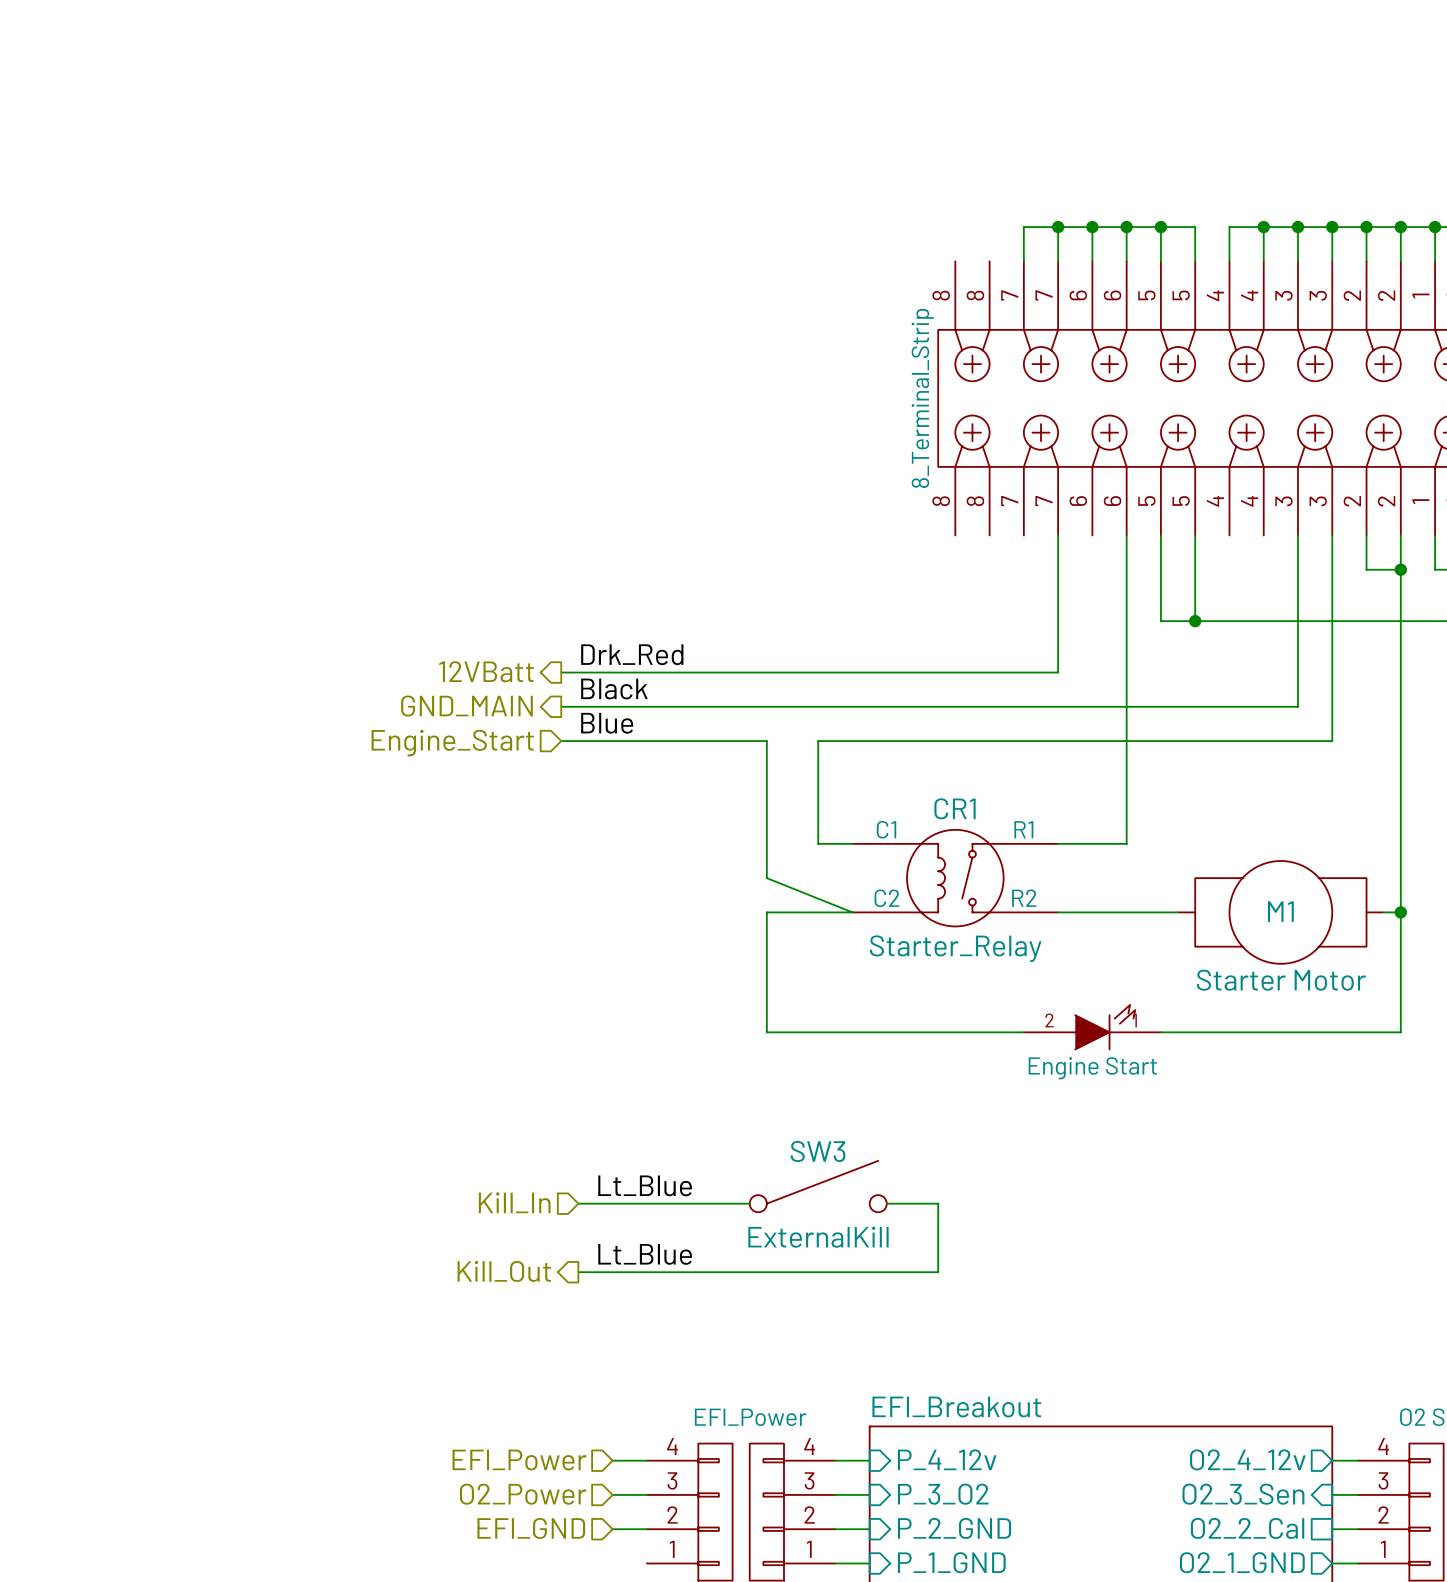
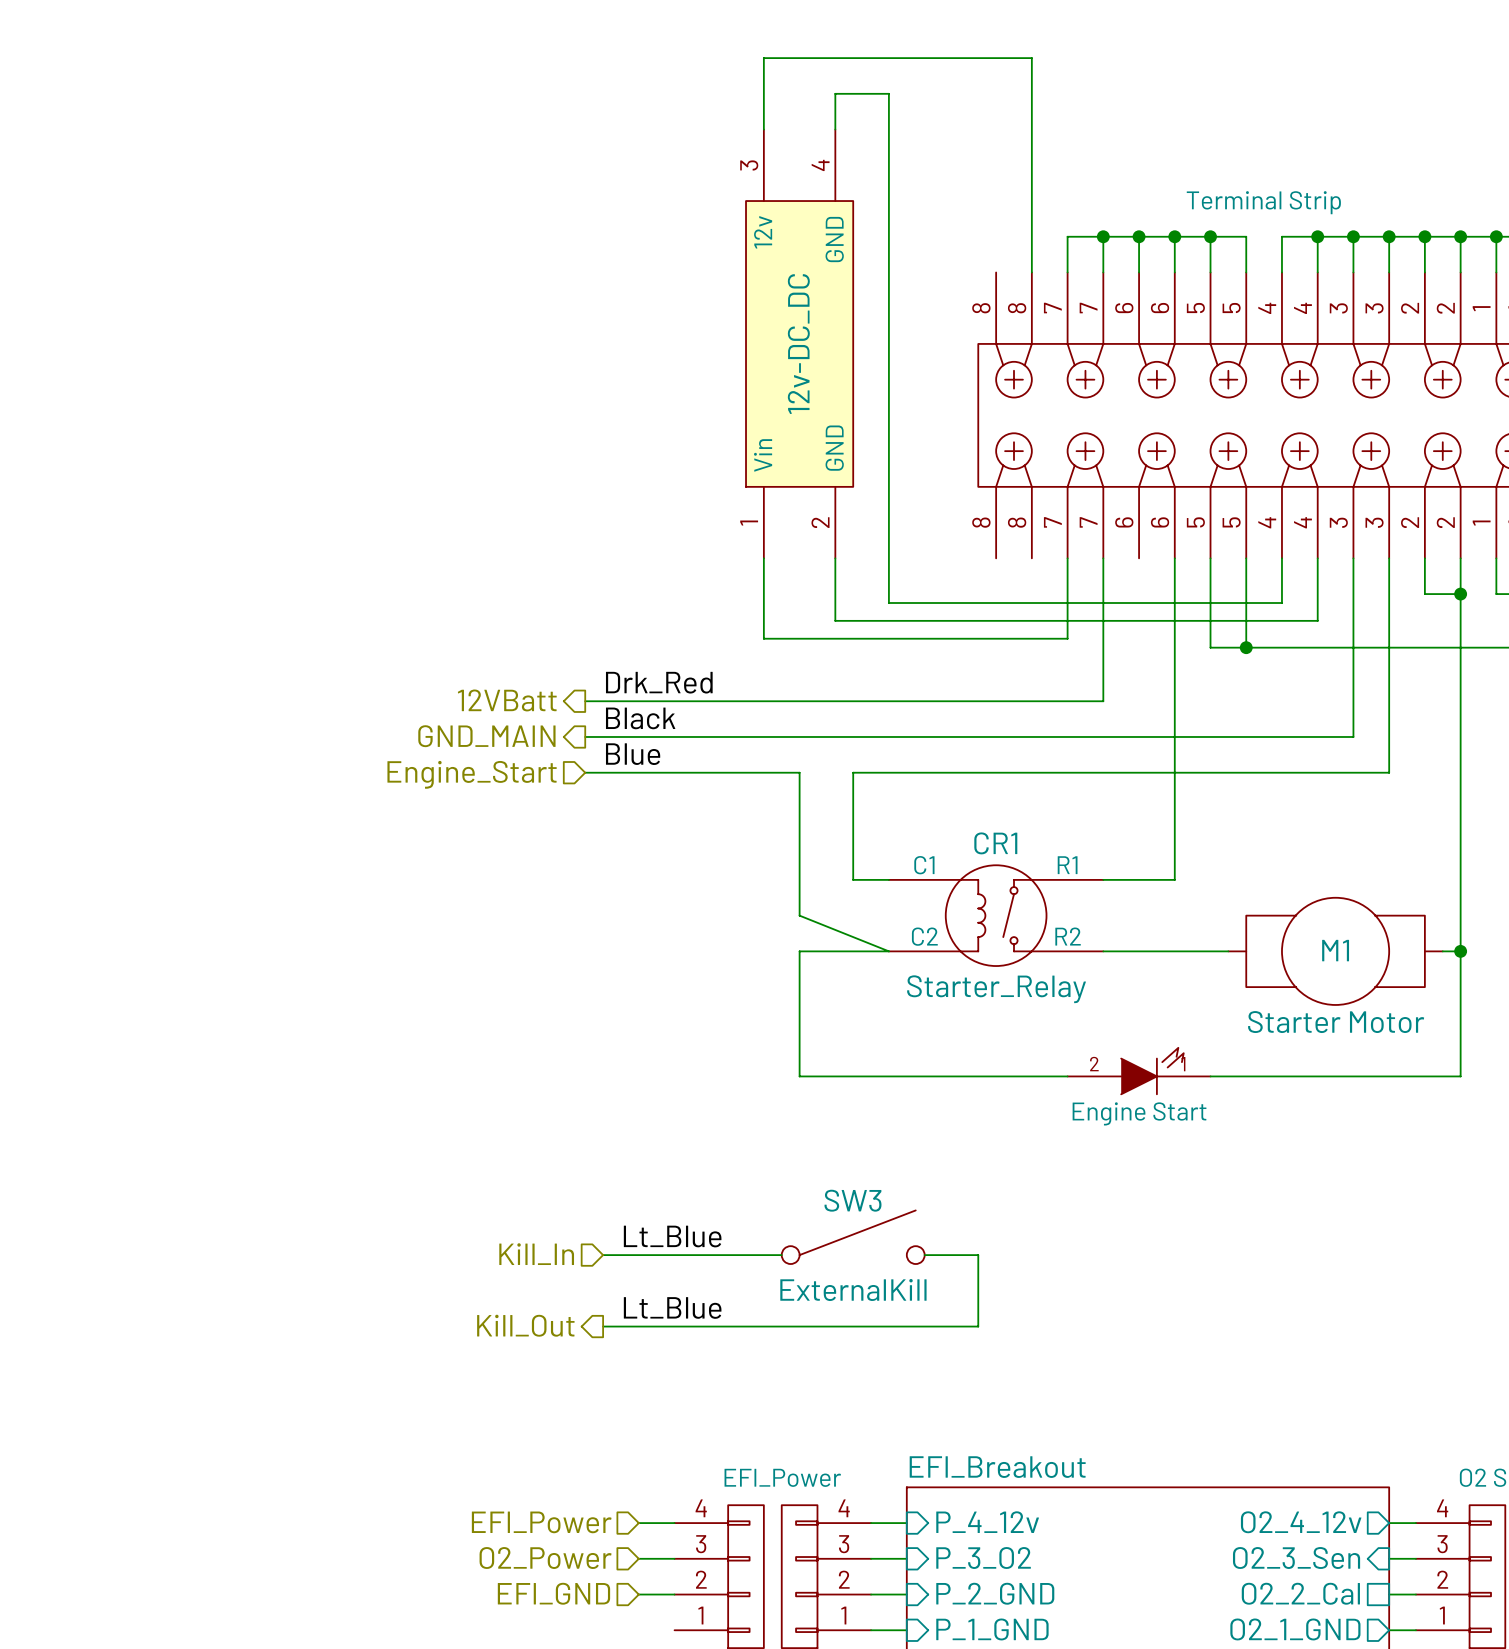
wire: none -> (763, 129) (763, 58) (1031, 58) (1031, 272)
wire: none -> (835, 129) (835, 93) (888, 93) (888, 603) (1281, 603) (1281, 558)
part: none -> 12v-DC_DC (799, 343)
part value: 8_Terminal_Strip (922, 398) -> Terminal Strip (1263, 202)
wire: none -> (763, 558) (763, 638) (1067, 638) (1067, 558)
wire: none -> (835, 558) (835, 620) (1317, 620) (1317, 558)

